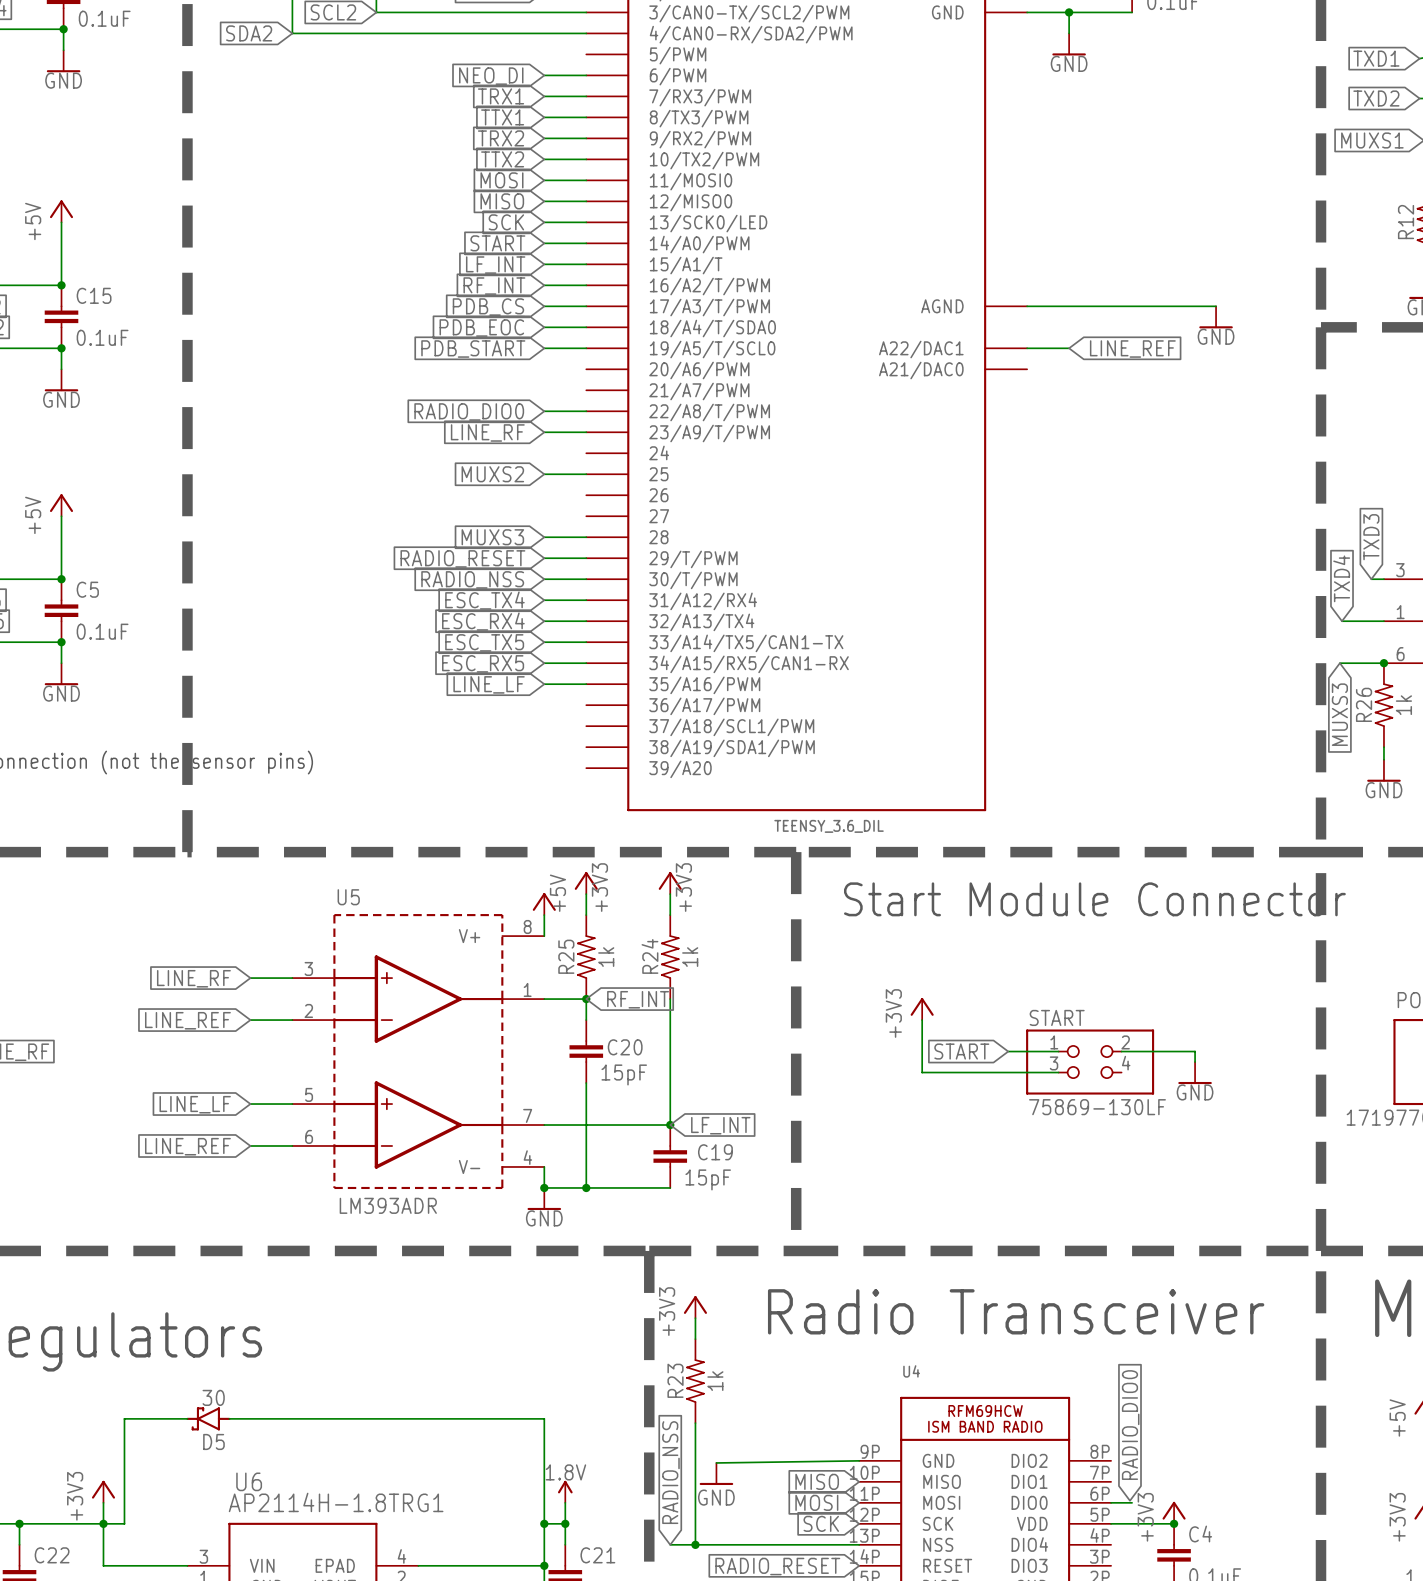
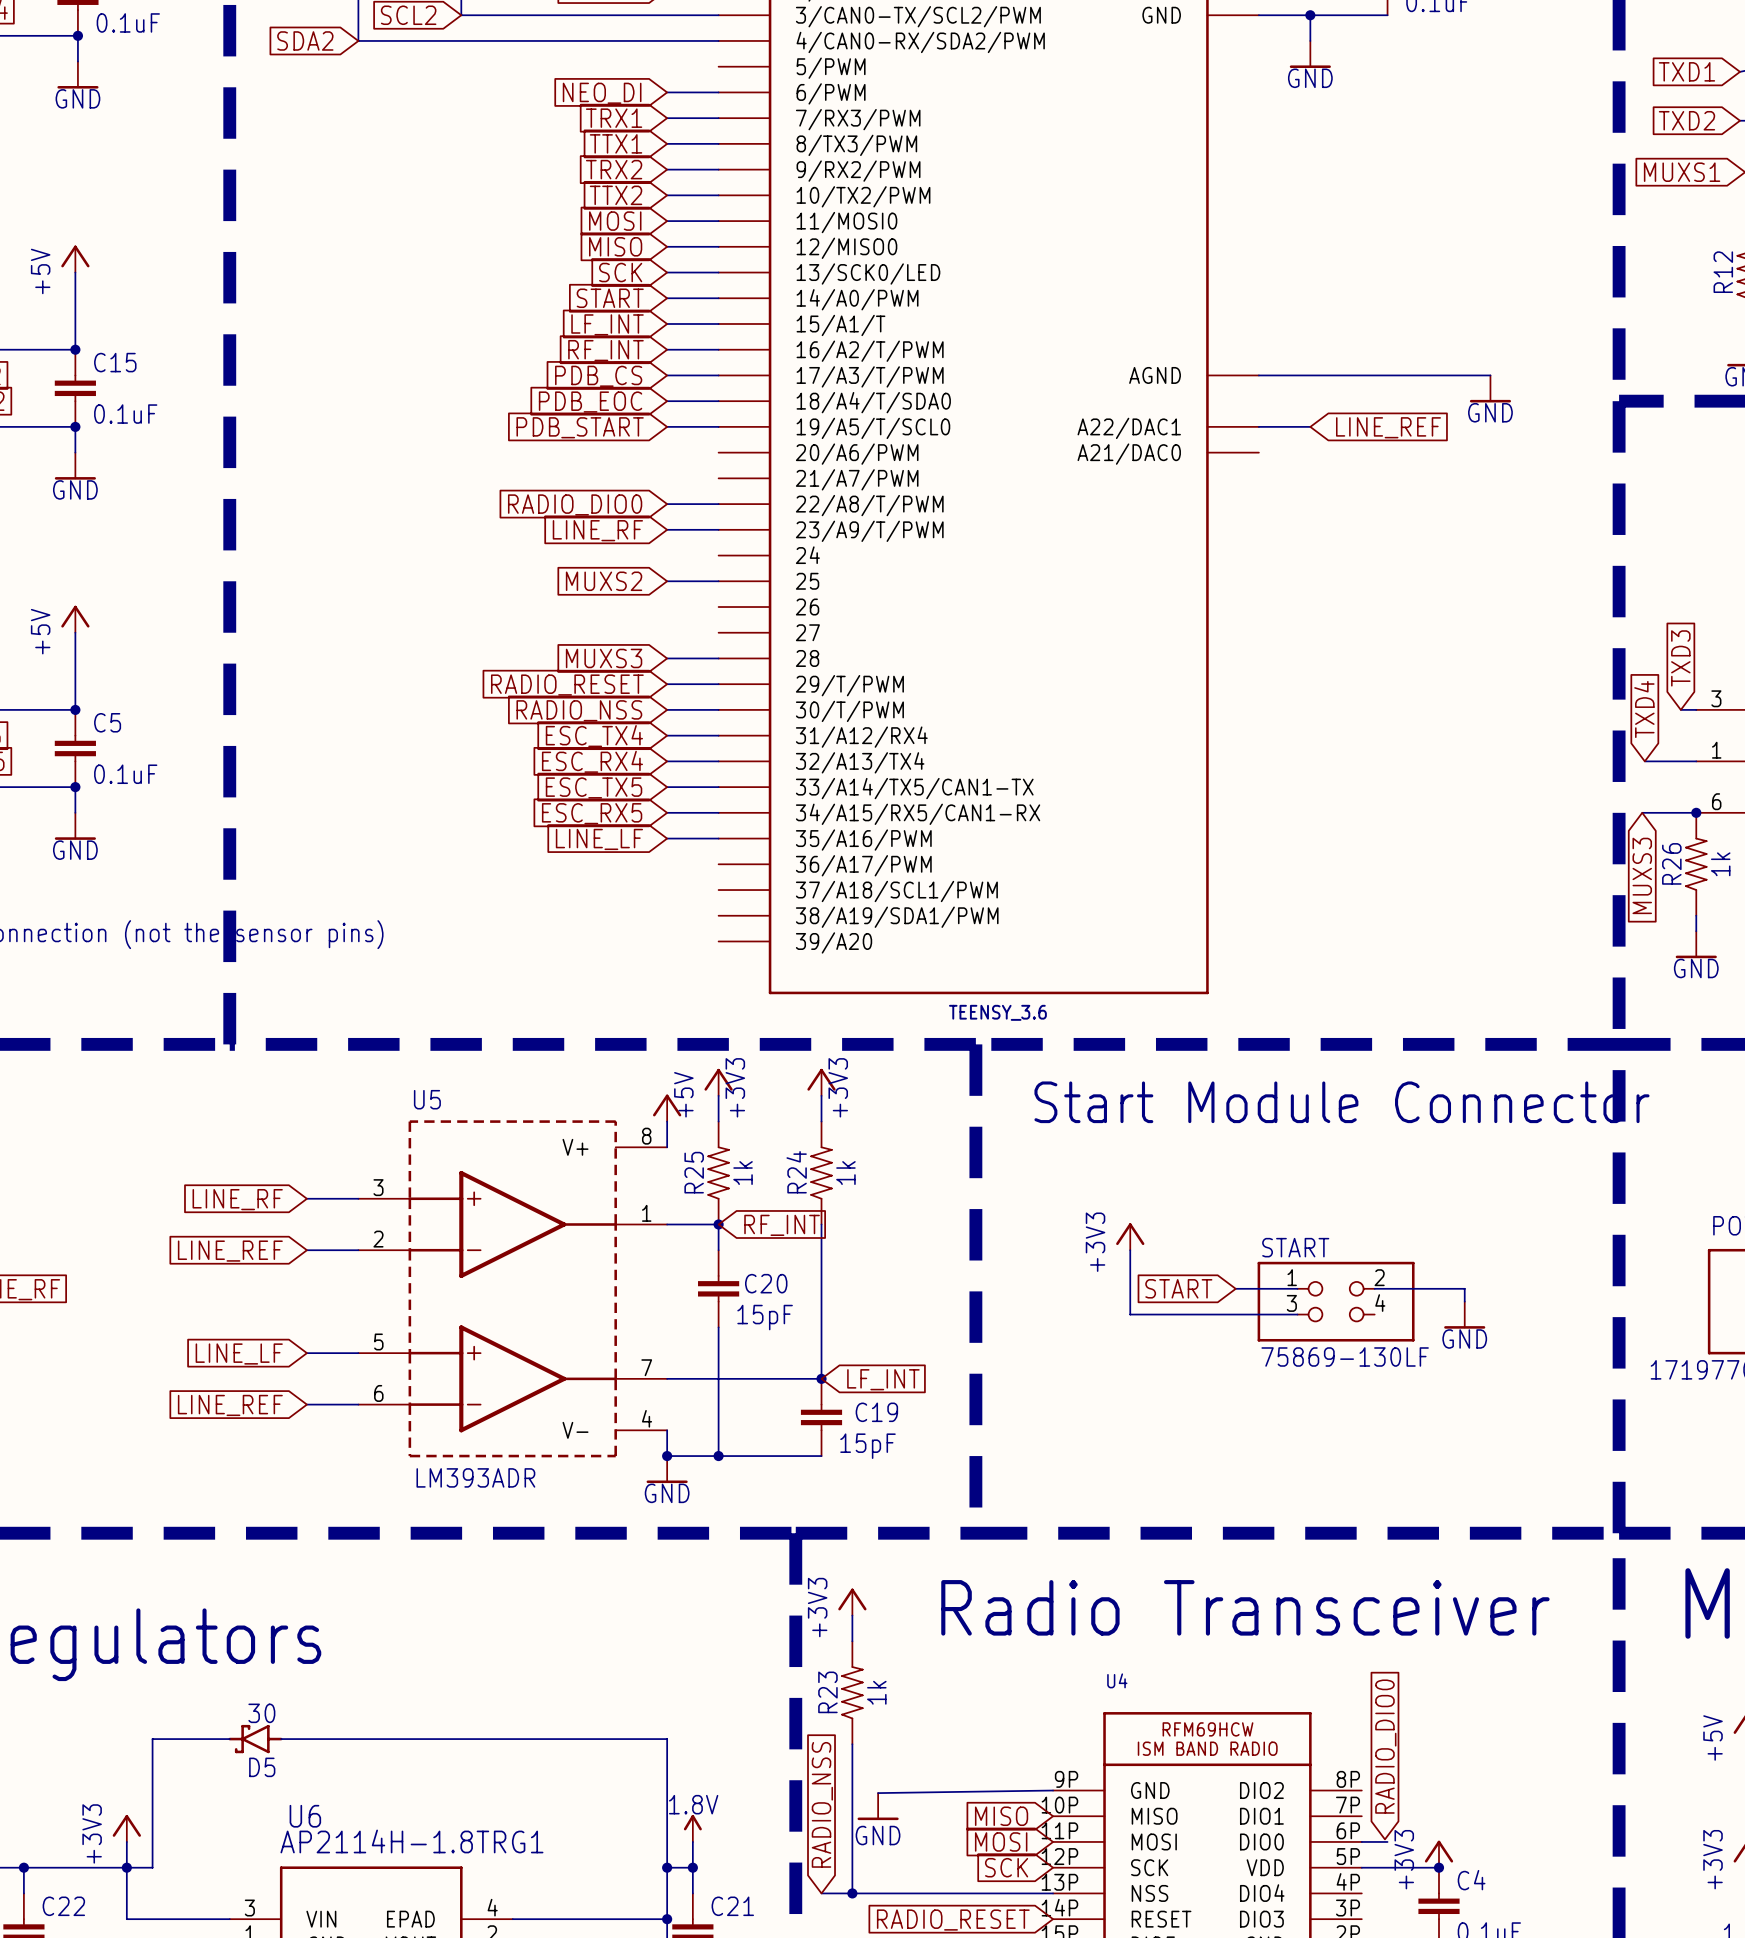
part value: TEENSY_3.6_DIL (829, 826) -> TEENSY_3.6 (997, 1012)

